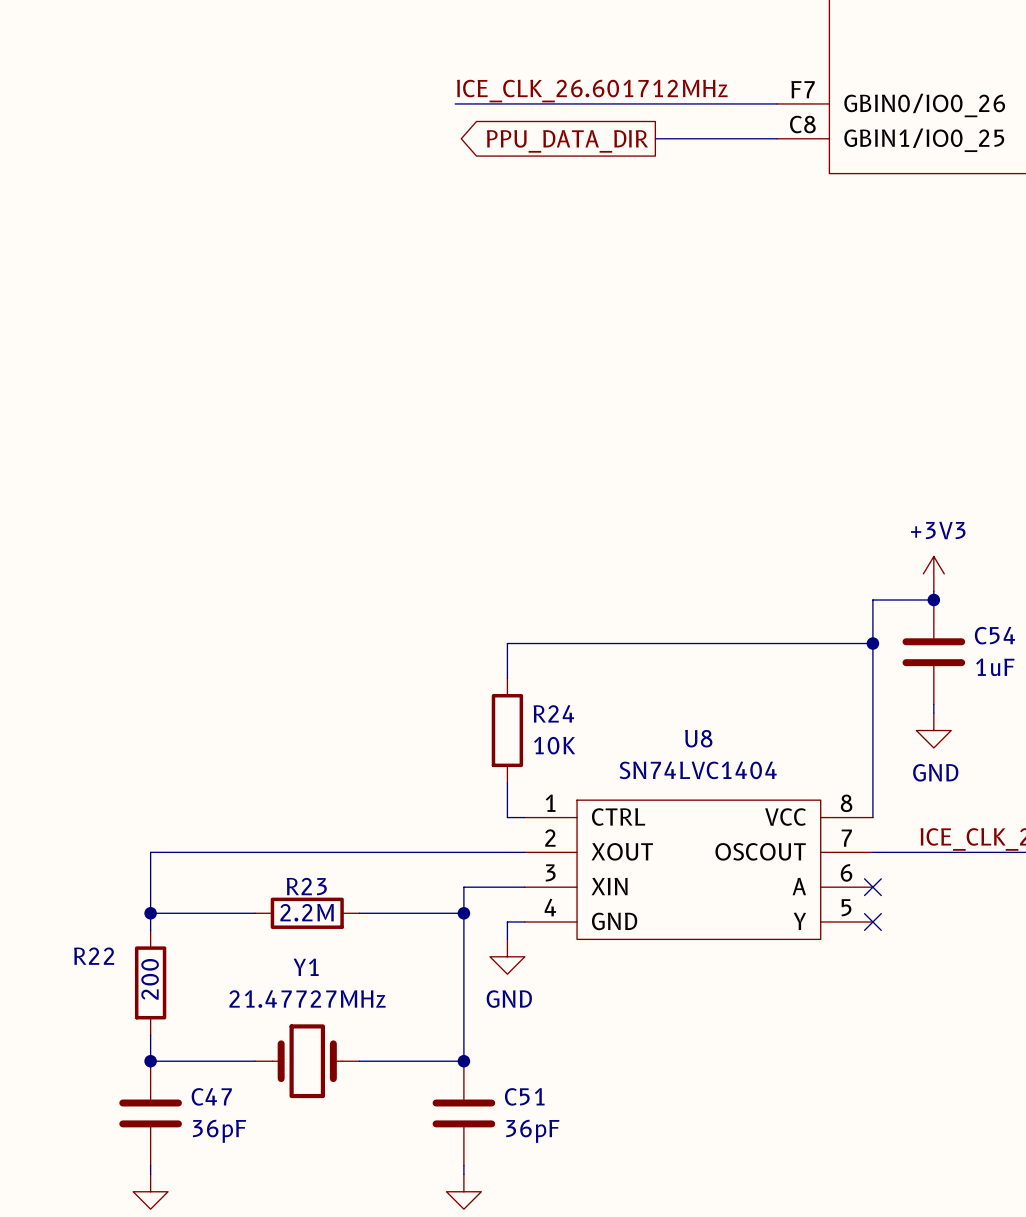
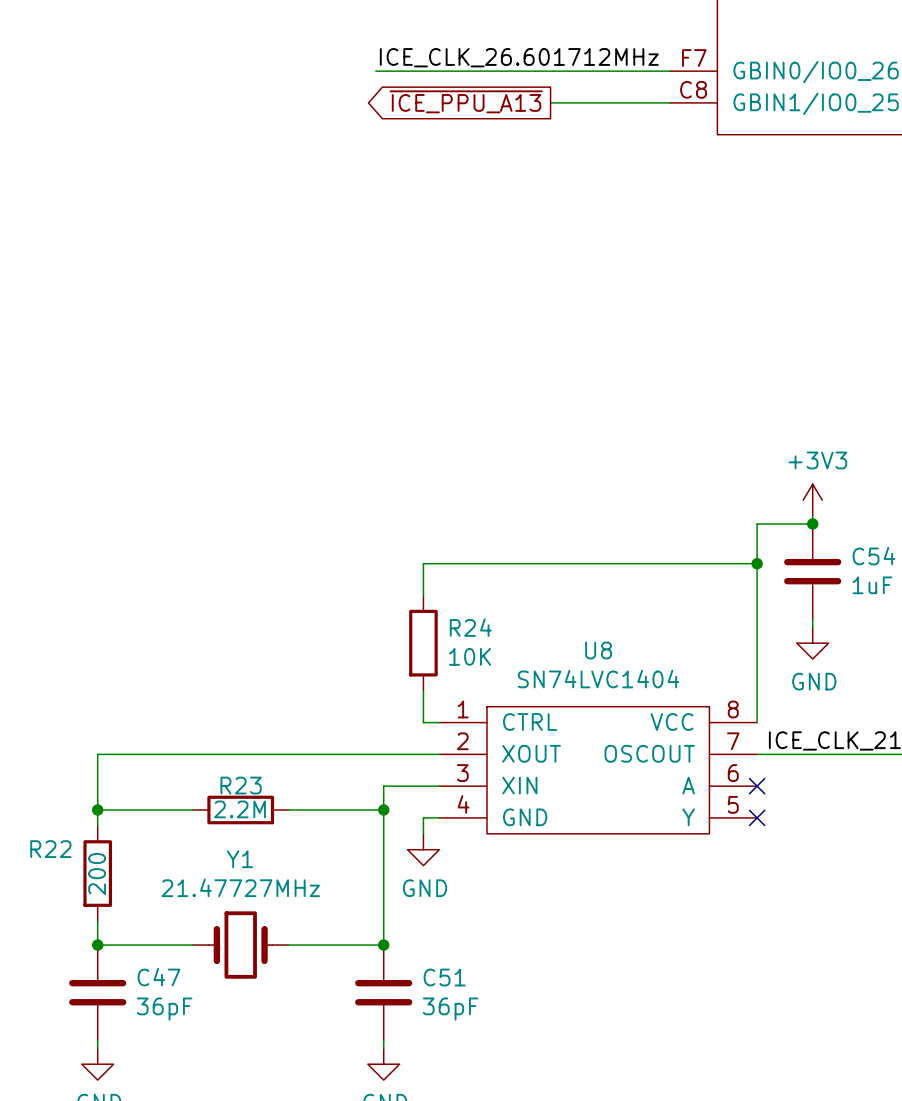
wire: none -> (550, 102) (558, 102)
global label: PPU_DATA_DIR (567, 141) -> ~{ICE_PPU_A13} (466, 101)

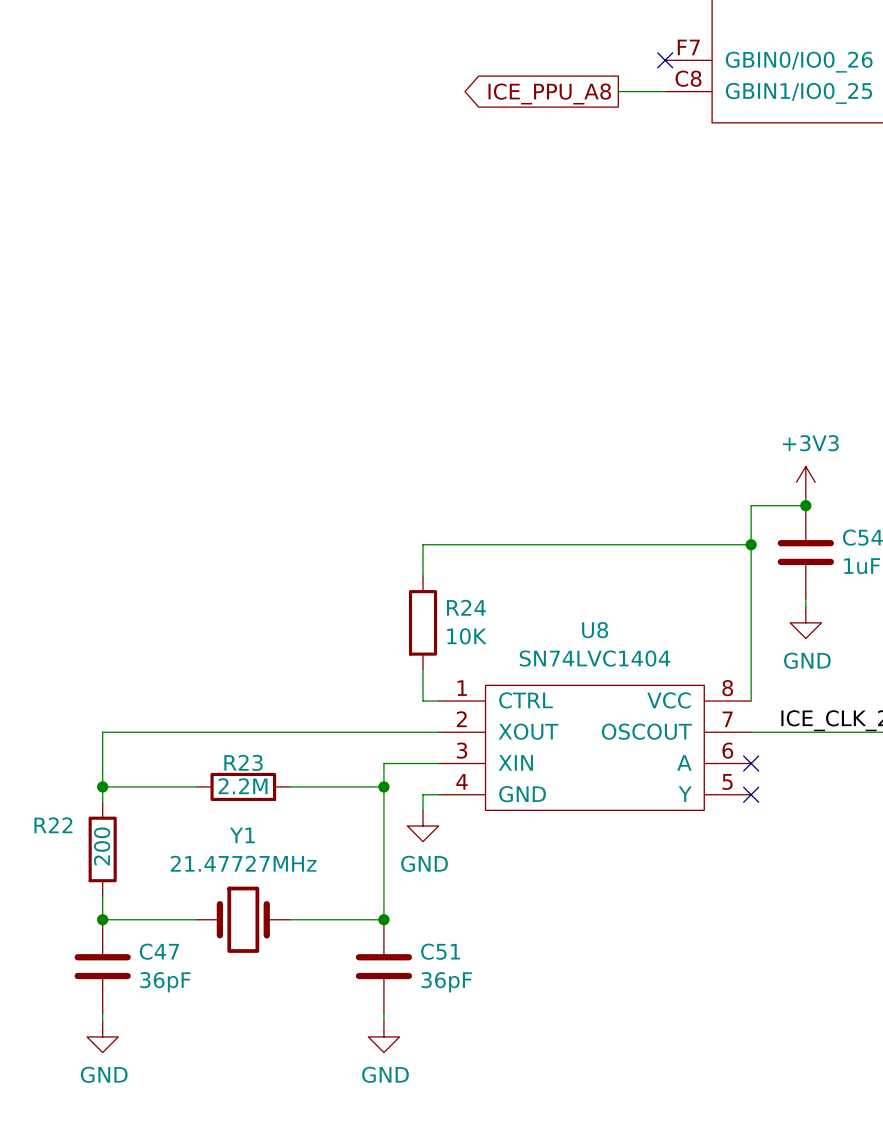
label: ICE_CLK_26.601712MHz (519, 57) -> none
wire: (375, 71) (669, 71) -> none
no-connect mark: none -> (665, 60)
global label: ~{ICE_PPU_A13} (466, 101) -> ICE_PPU_A8 (549, 93)
wire: (550, 102) (622, 102) -> none

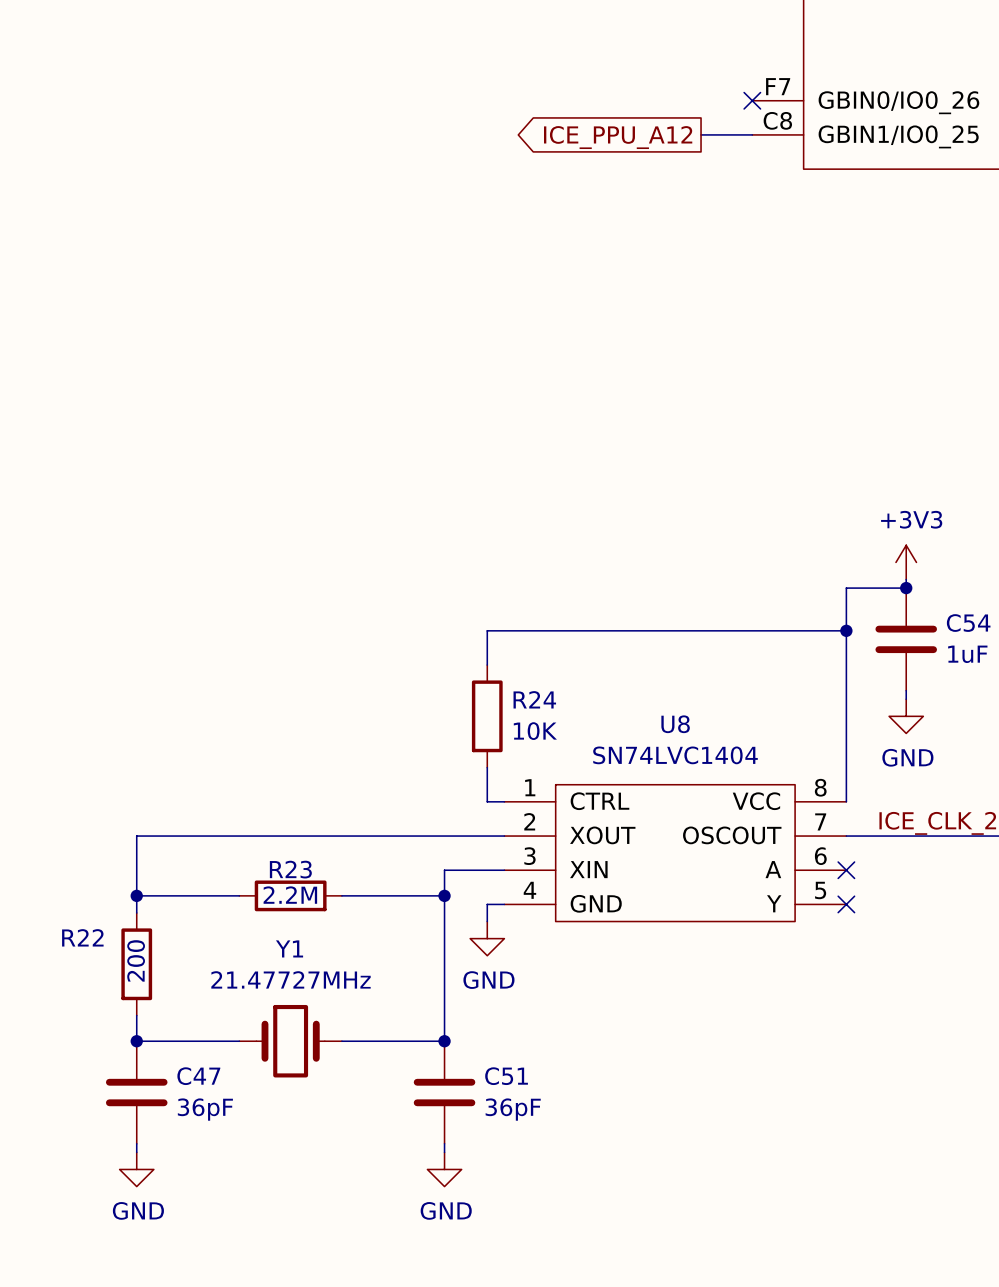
global label: ICE_PPU_A8 (549, 93) -> ICE_PPU_A12 (618, 137)

